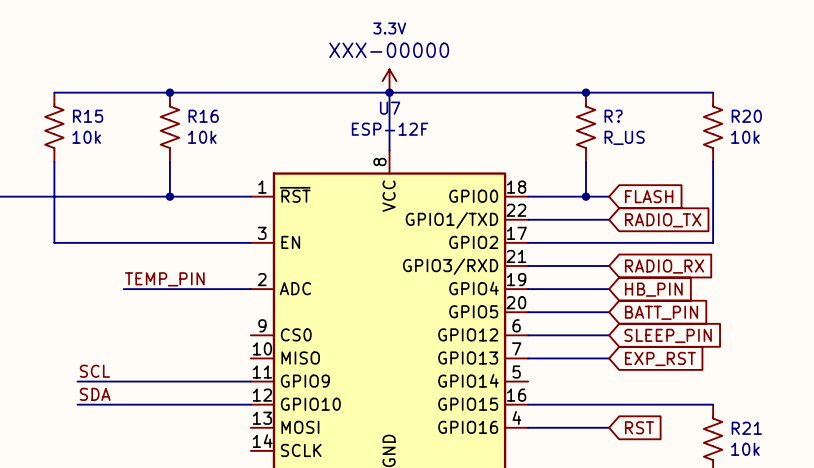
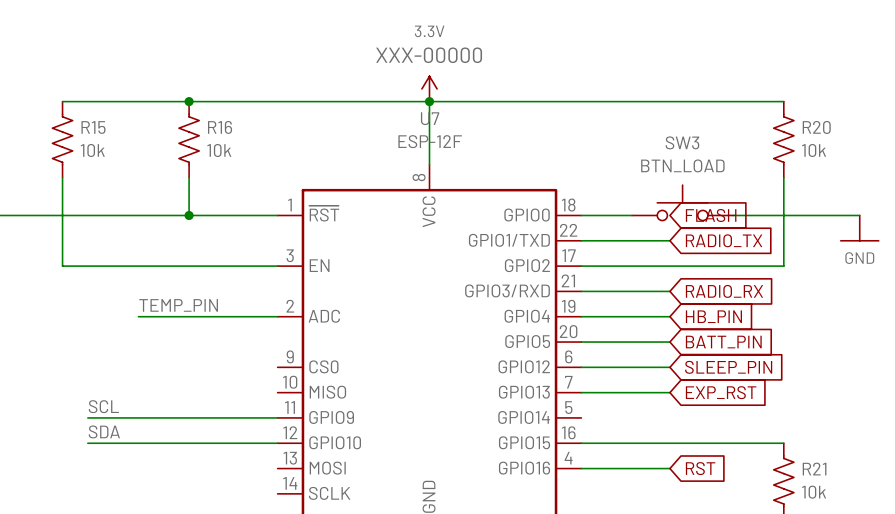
junction: (585, 92) -> none
R?: R_US (585, 127) -> none
wire: (585, 161) (585, 196) -> none
SW3: none -> BTN_LOAD (682, 202)
junction: (585, 196) -> none
wire: none -> (733, 215) (859, 215)
power symbol: none -> GND (859, 228)

